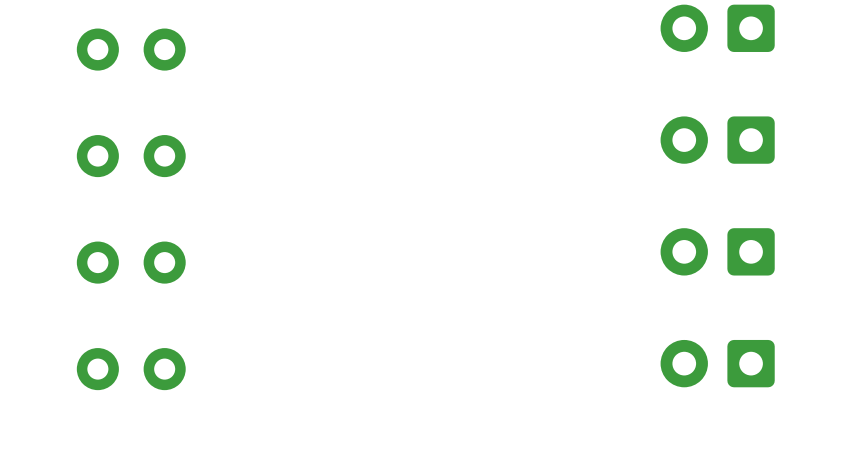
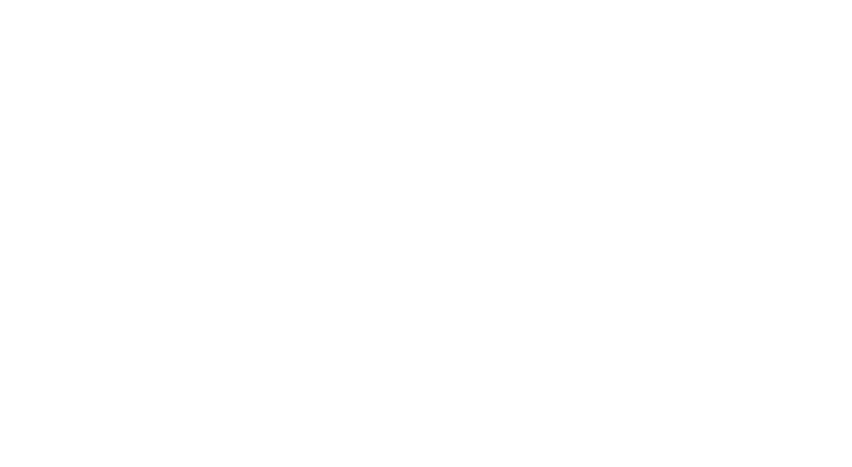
part: (717, 28) -> none
part: (131, 49) -> none
part: (717, 140) -> none
part: (131, 156) -> none
part: (717, 251) -> none
part: (131, 262) -> none
part: (717, 363) -> none
part: (131, 369) -> none

